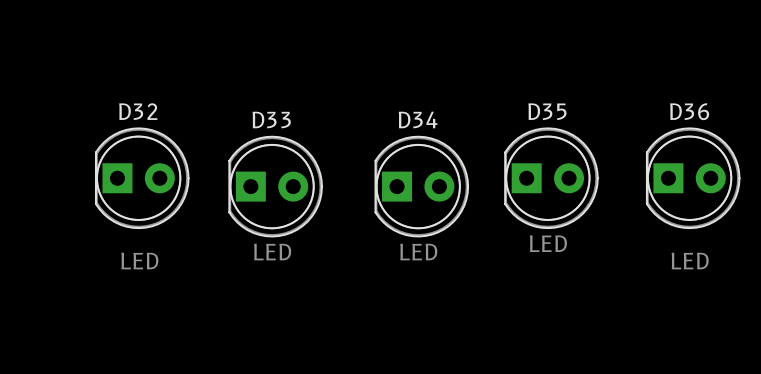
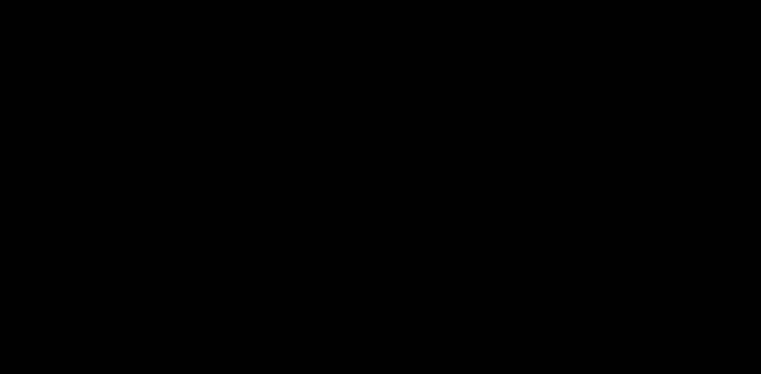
D32: LED (142, 178) -> none
D35: LED (551, 178) -> none
D36: LED (693, 178) -> none
D33: LED (275, 186) -> none
D34: LED (421, 186) -> none

